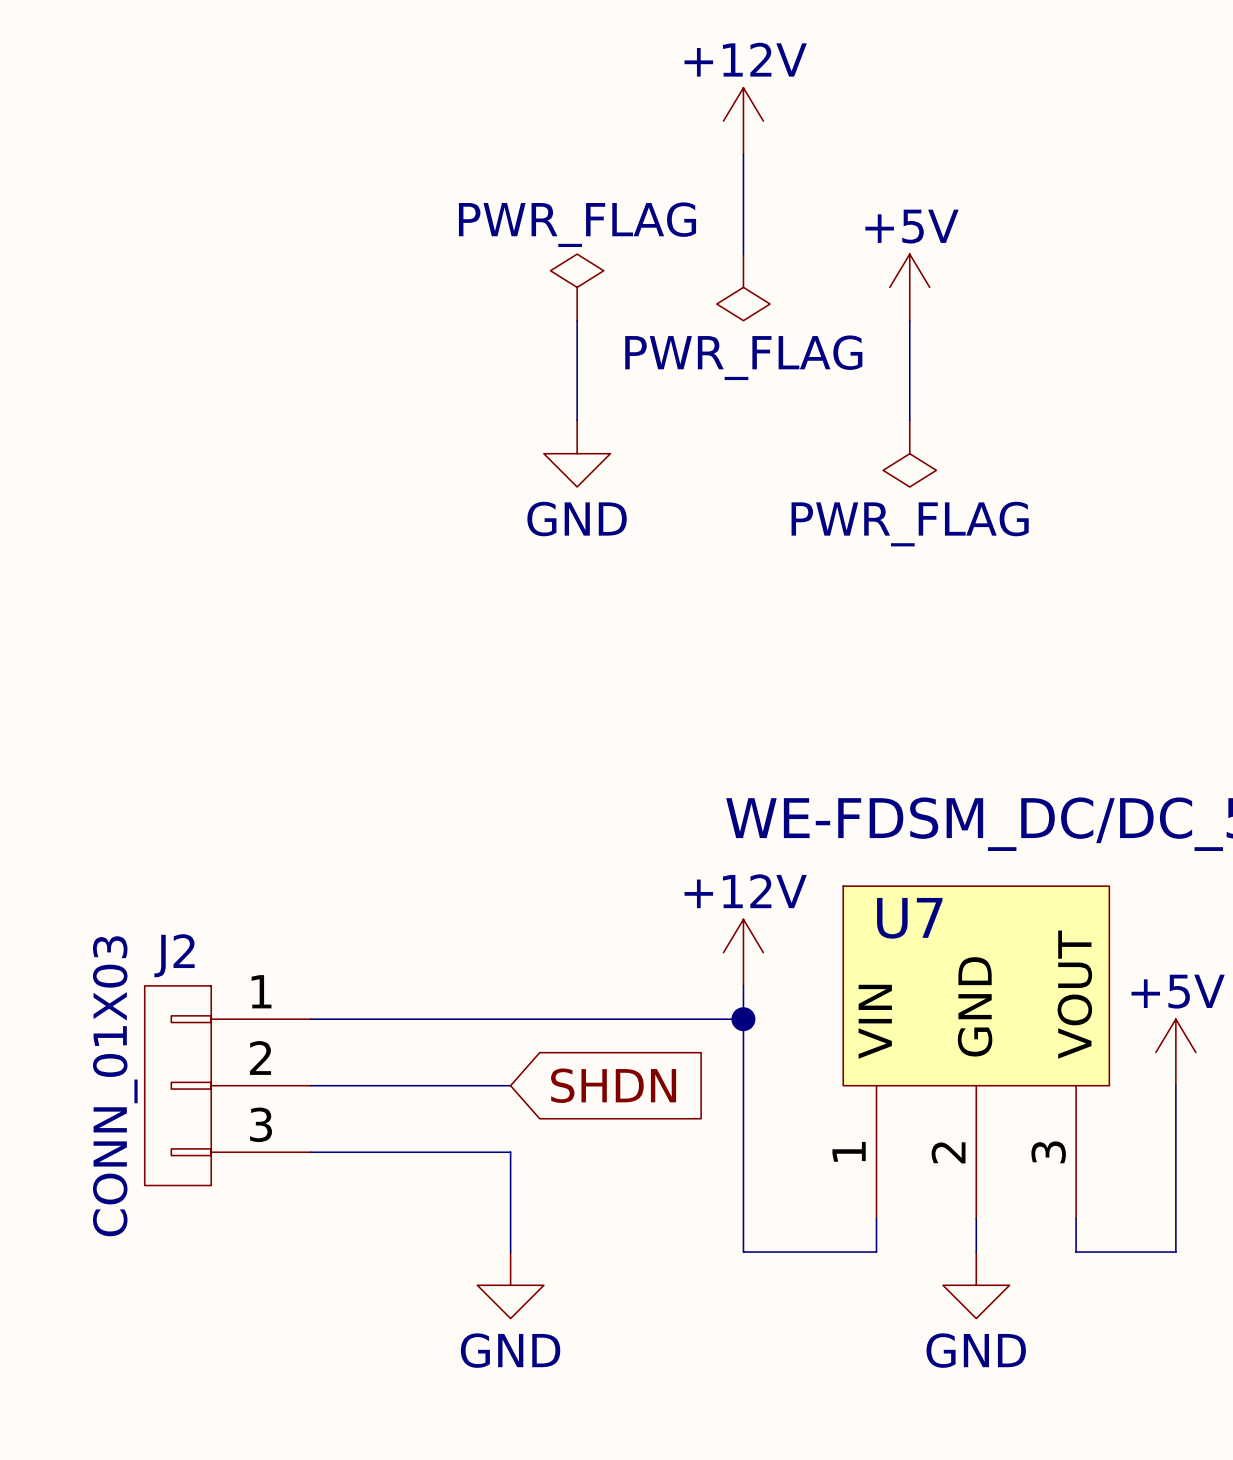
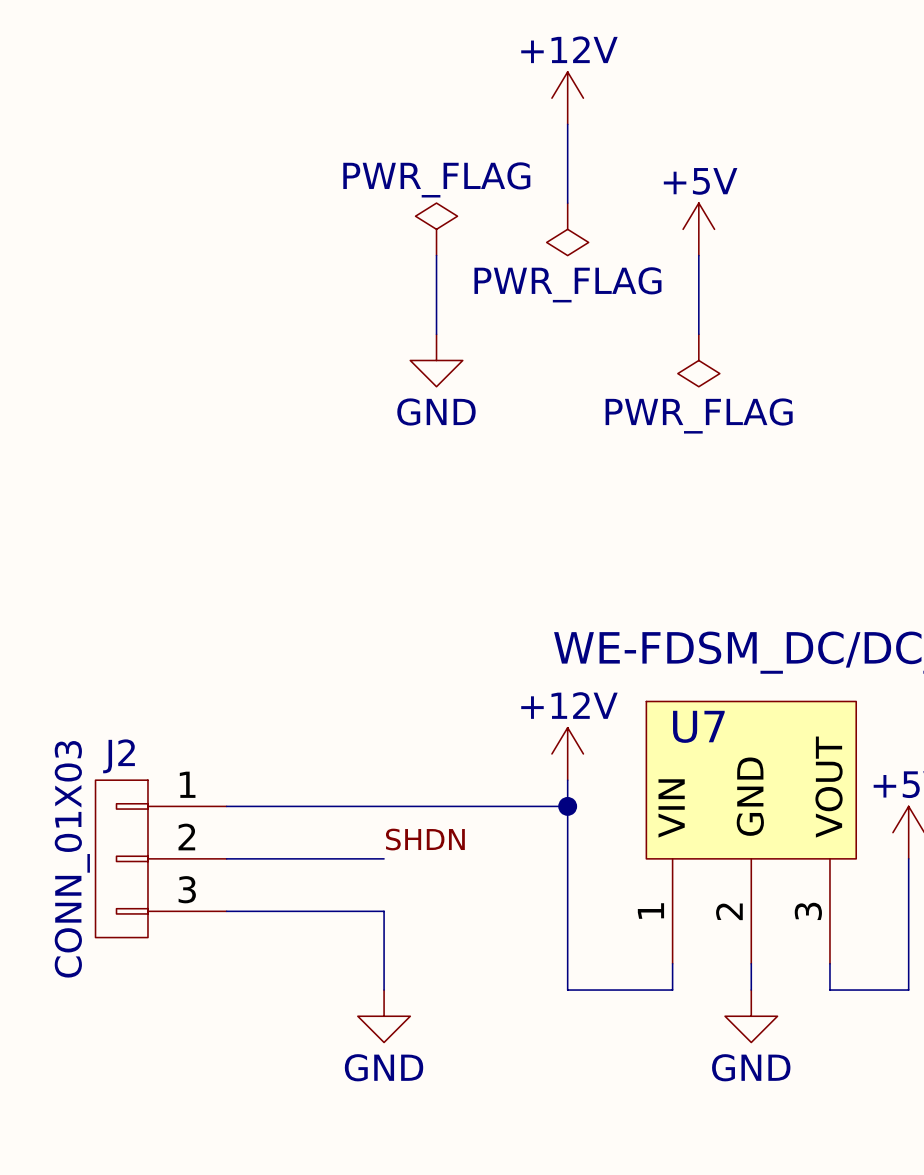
label: none -> SHDN (425, 839)
global label: SHDN (613, 1085) -> none

